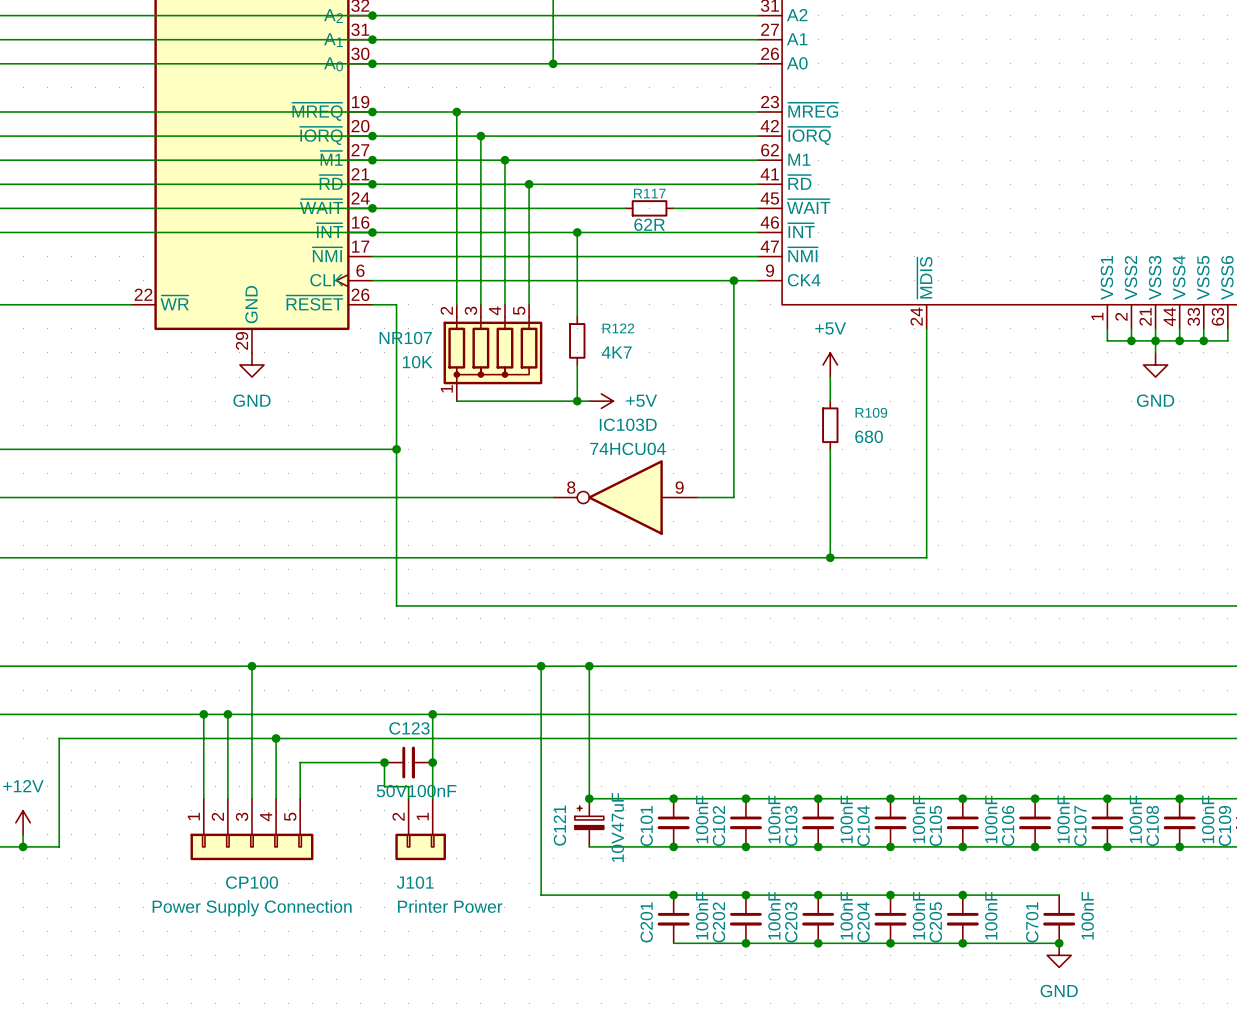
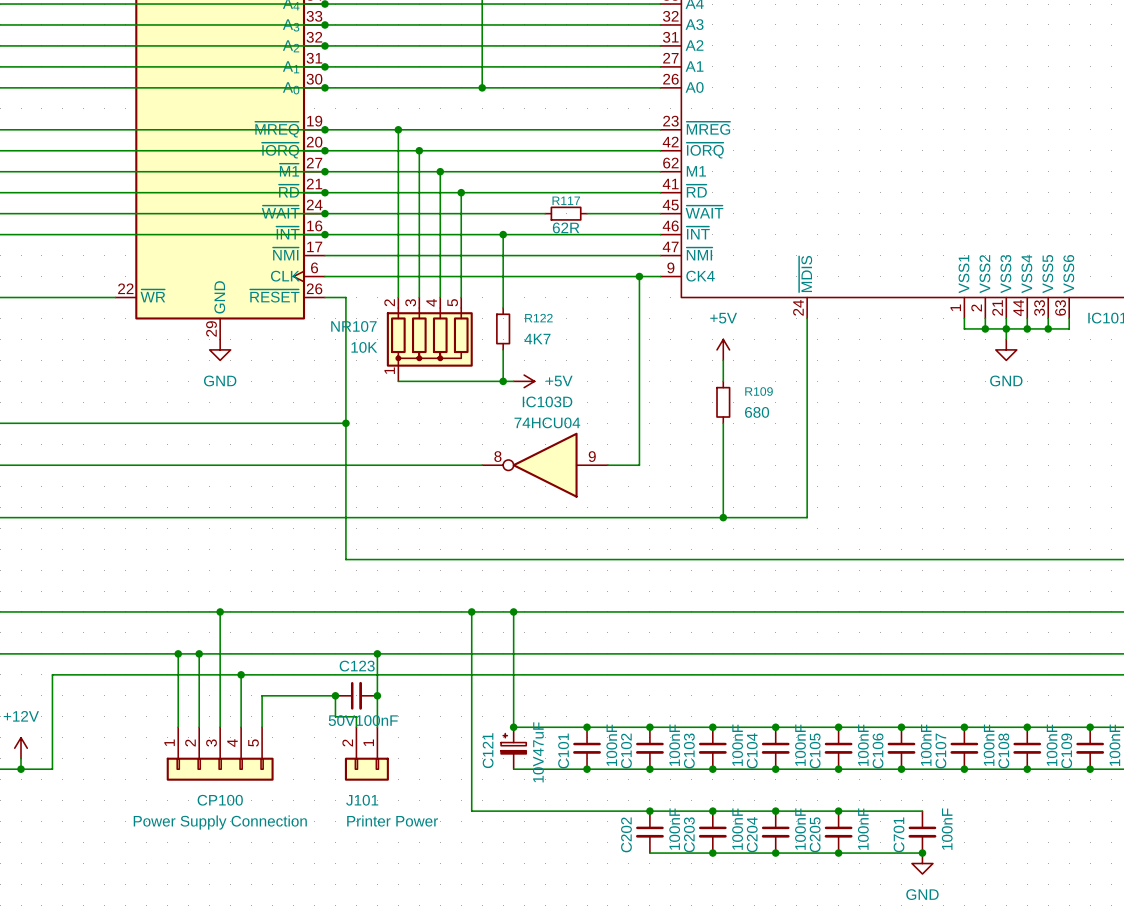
junction: (673, 895) -> none
C201: 100nF (673, 919) -> none
wire: (673, 943) (745, 943) -> none
junction: (745, 943) -> none

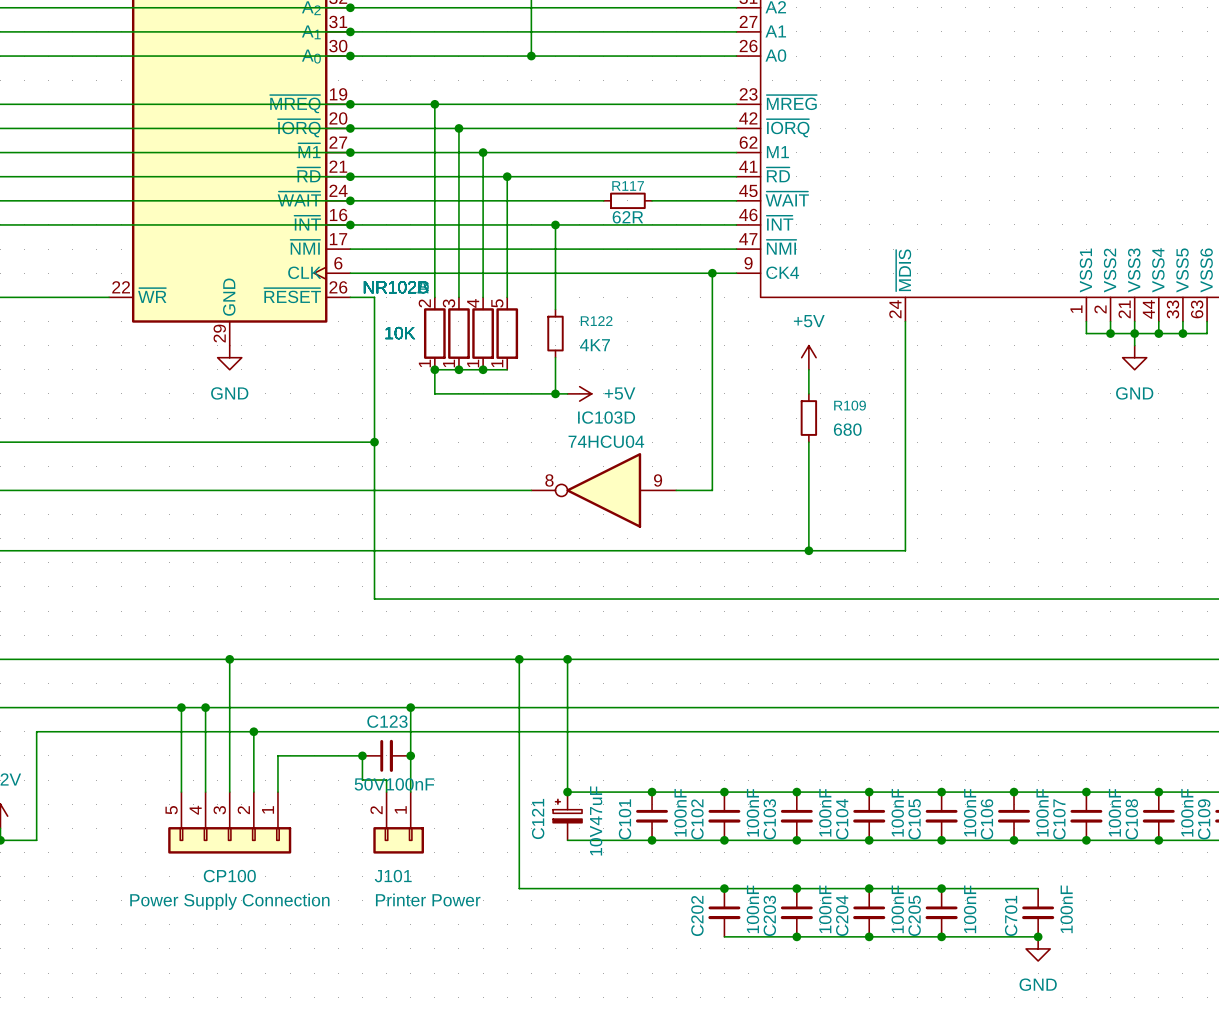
part: none -> 10K (434, 333)
part: none -> 10K (458, 333)
part: none -> 10K (483, 333)
part: none -> 10K (507, 333)
NR107: 10K (429, 339) -> none
junction: none -> (434, 369)
junction: none -> (458, 369)
junction: none -> (483, 369)
CP100 flip: as is (220, 769) -> left-right (229, 840)

